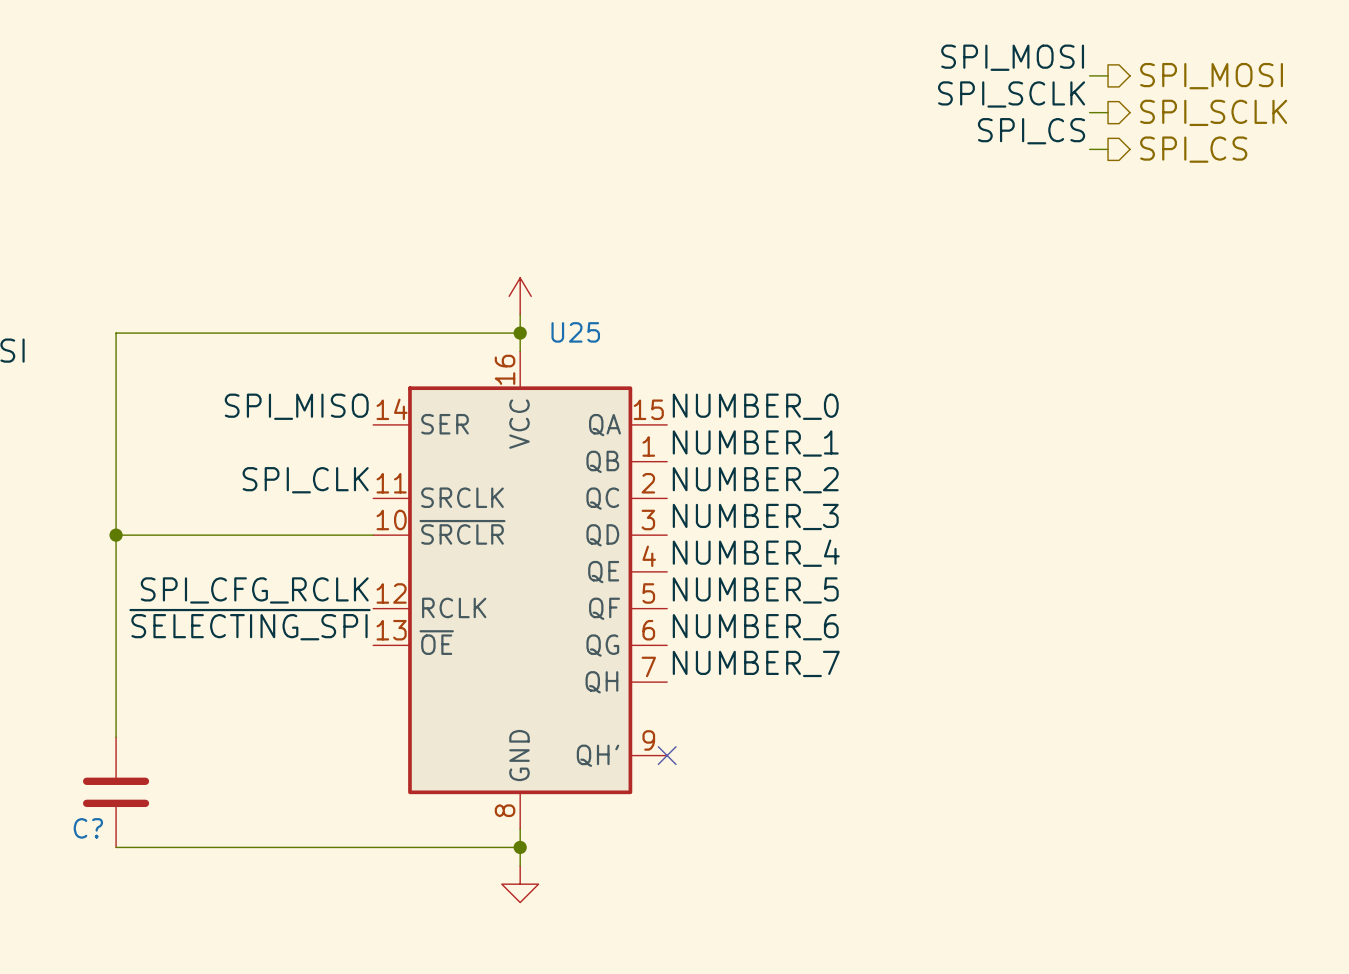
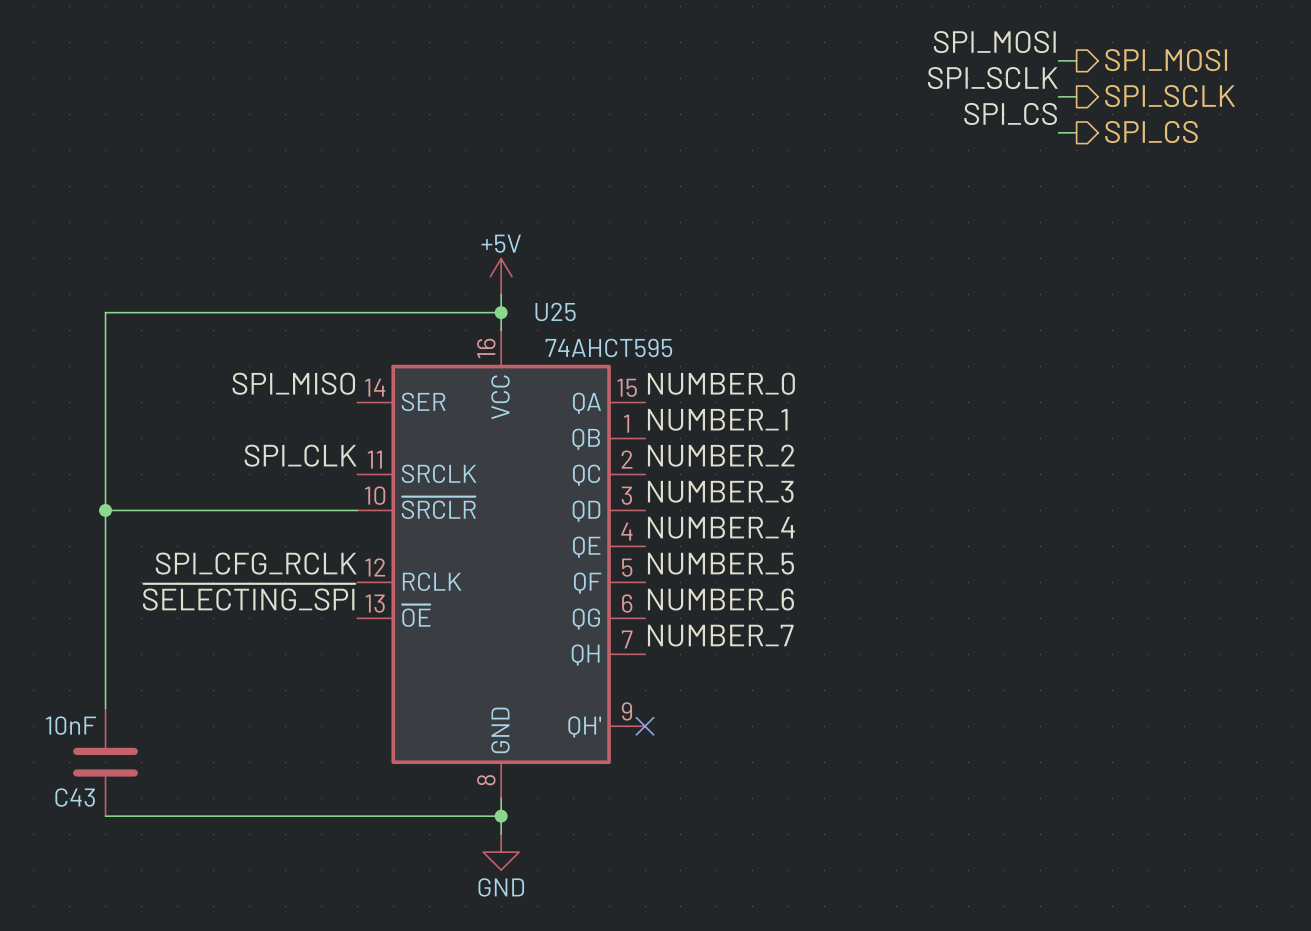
power symbol text: none -> +5V (501, 243)
U25 value: none -> 74AHCT595 (608, 347)
C? value: none -> 10nF (71, 725)
C? name: C? (88, 828) -> C43 (75, 797)
power symbol text: none -> GND (501, 887)

